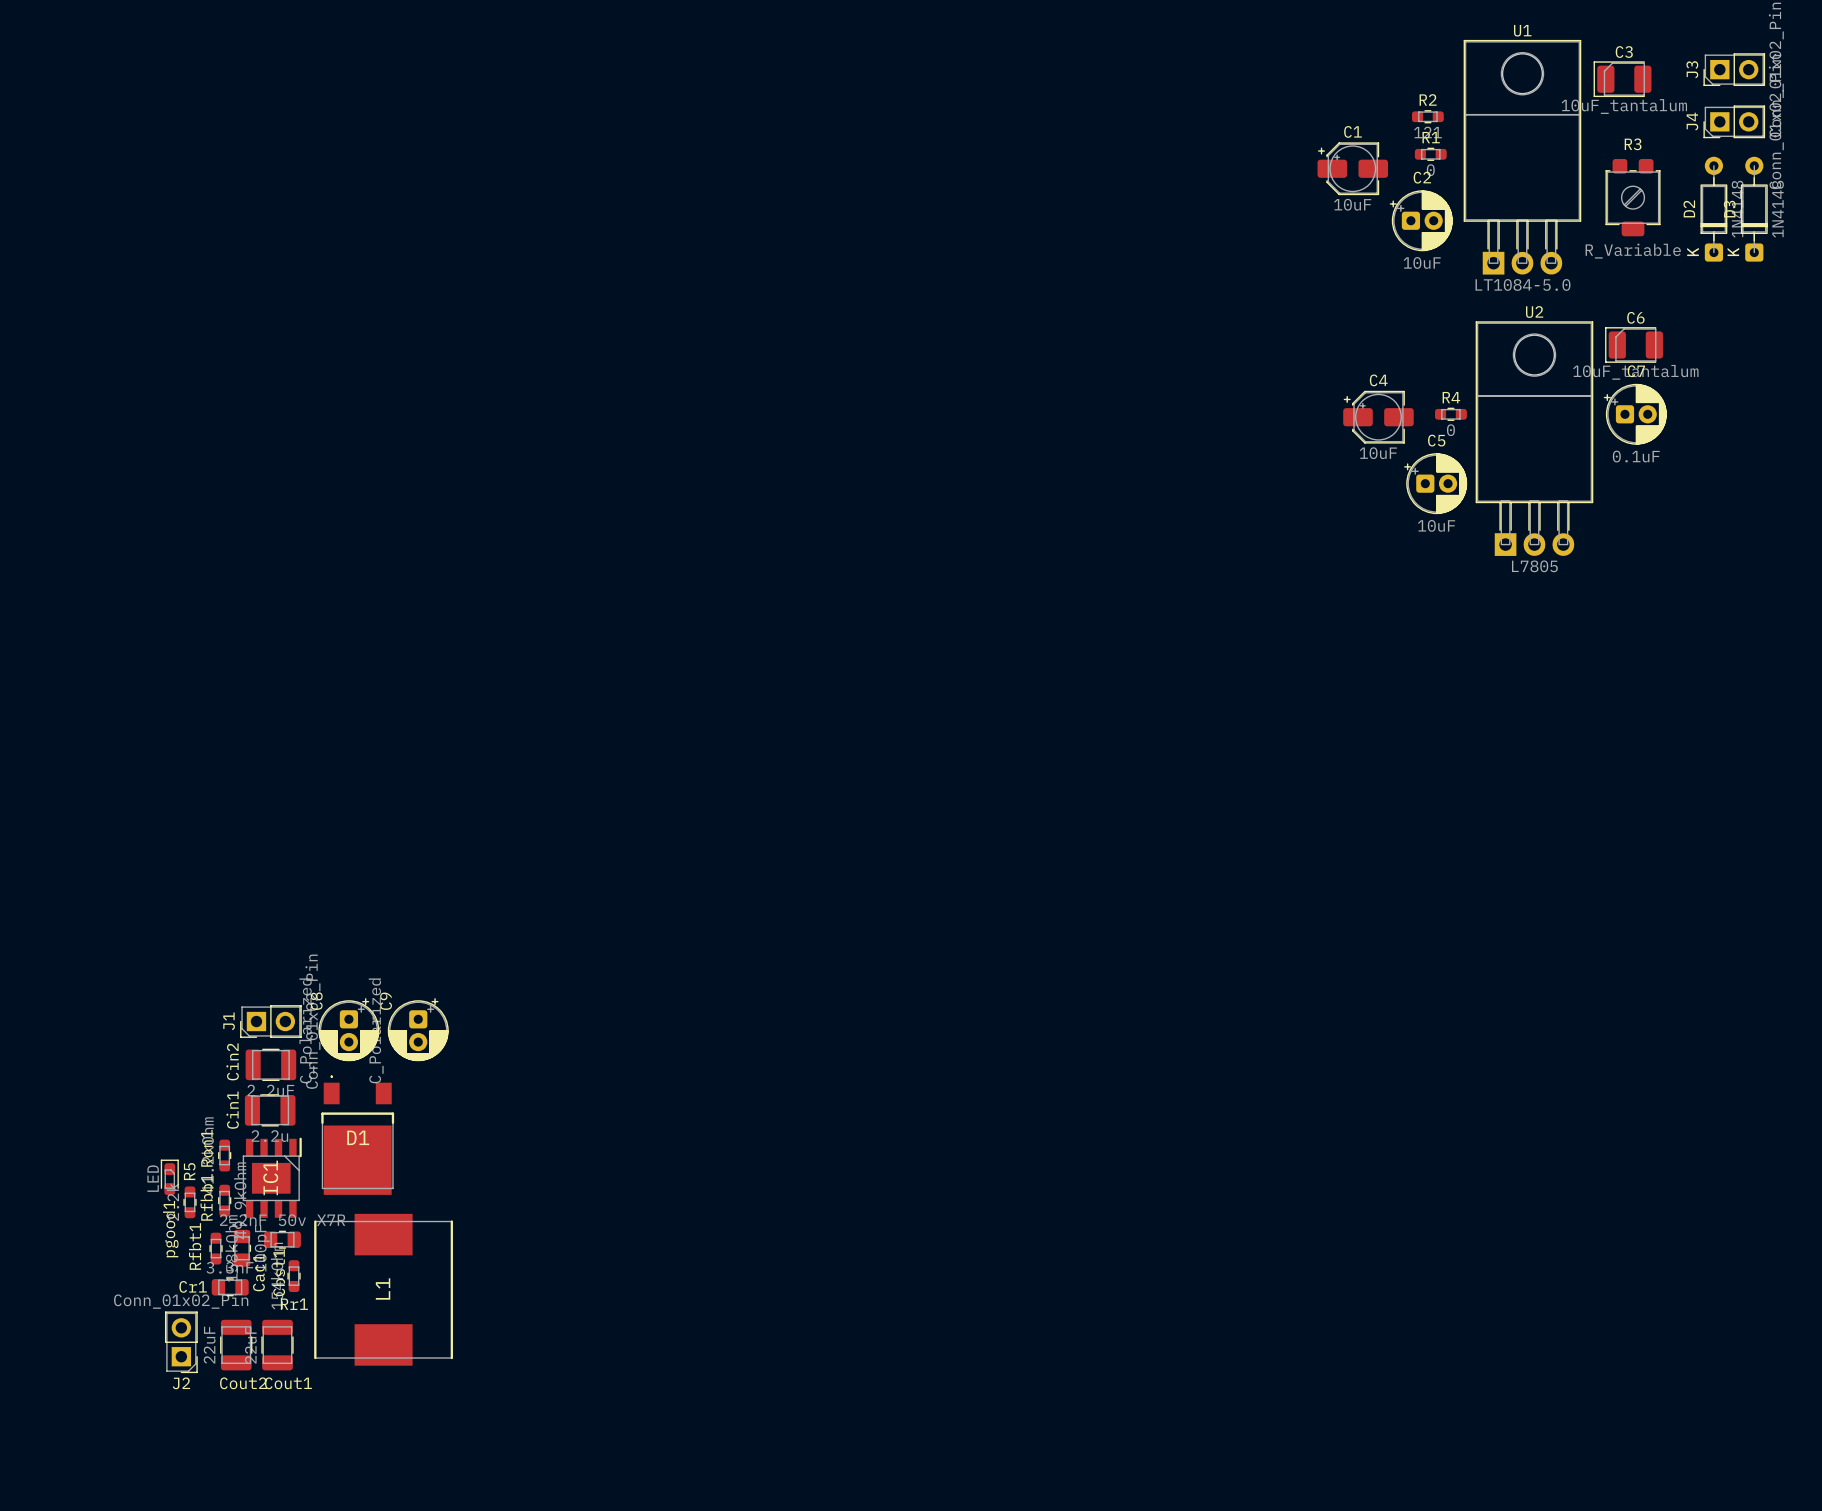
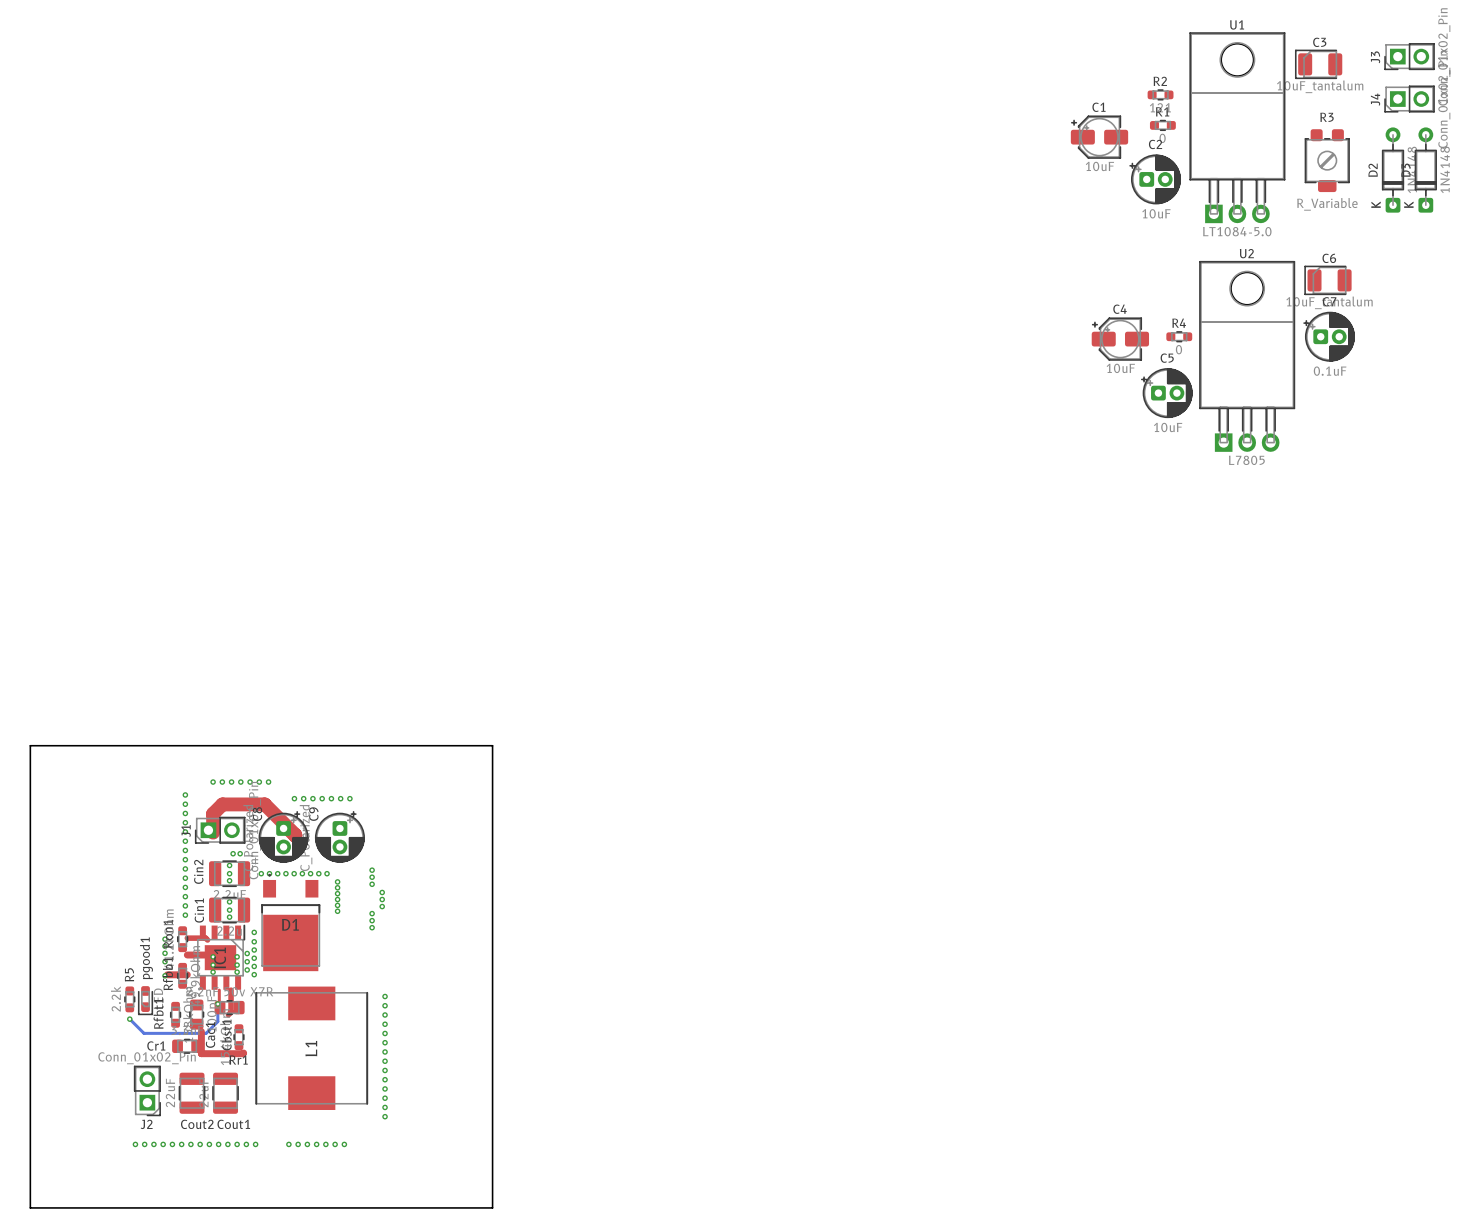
board edge: none -> (30, 745) (492, 745) (492, 1207) (30, 1207) (30, 745)
via: none -> (213, 782)
via: none -> (222, 782)
via: none -> (231, 782)
via: none -> (240, 782)
via: none -> (250, 782)
via: none -> (259, 782)
via: none -> (268, 782)
via: none -> (185, 794)
via: none -> (294, 798)
via: none -> (303, 798)
via: none -> (312, 798)
via: none -> (322, 798)
via: none -> (331, 798)
via: none -> (340, 798)
via: none -> (349, 798)
via: none -> (185, 804)
via: none -> (185, 813)
via: none -> (185, 822)
top track: none -> (288, 828) (295, 835) (264, 804) (222, 804) (213, 813) (213, 832)
via: none -> (185, 831)
via: none -> (185, 841)
via: none -> (185, 850)
via: none -> (233, 853)
via: none -> (240, 853)
via: none -> (185, 859)
Cin2 position: (270, 1064) -> (229, 873)
via: none -> (229, 865)
via: none -> (185, 868)
via: none -> (372, 870)
via: none -> (229, 873)
via: none -> (261, 873)
via: none -> (269, 873)
via: none -> (277, 873)
via: none -> (285, 873)
via: none -> (294, 873)
via: none -> (302, 873)
via: none -> (310, 873)
via: none -> (318, 873)
via: none -> (327, 873)
via: none -> (372, 877)
via: none -> (185, 878)
via: none -> (229, 880)
via: none -> (337, 881)
via: none -> (372, 884)
via: none -> (185, 887)
via: none -> (337, 887)
via: none -> (382, 892)
via: none -> (337, 893)
via: none -> (185, 896)
via: none -> (337, 899)
via: none -> (382, 899)
via: none -> (229, 901)
Cin1 position: (270, 1110) -> (229, 910)
via: none -> (337, 905)
via: none -> (185, 905)
via: none -> (382, 906)
via: none -> (229, 910)
via: none -> (337, 911)
via: none -> (372, 913)
via: none -> (185, 915)
via: none -> (229, 917)
via: none -> (372, 920)
via: none -> (372, 927)
via: none -> (254, 932)
top track: none -> (187, 938) (205, 938) (207, 940)
via: none -> (165, 939)
via: none -> (254, 941)
via: none -> (165, 946)
via: none -> (254, 950)
via: none -> (165, 953)
via: none -> (247, 953)
top track: none -> (187, 955) (211, 955) (213, 956)
pgood1 rotation: 0° (169, 1177) -> 180° (145, 1000)
pgood1 position: (169, 1177) -> (145, 1000)
via: none -> (213, 956)
via: none -> (237, 956)
via: none -> (254, 958)
via: none -> (165, 961)
via: none -> (247, 961)
via: none -> (213, 965)
via: none -> (237, 965)
via: none -> (254, 966)
via: none -> (247, 969)
via: none -> (213, 972)
via: none -> (237, 972)
top track: none -> (167, 974) (187, 974)
via: none -> (254, 974)
via: none -> (165, 975)
R5 position: (190, 1202) -> (129, 999)
top track: none -> (219, 990) (217, 1004)
top track: none -> (231, 990) (231, 1012) (228, 1014)
via: none -> (385, 996)
bottom track: none -> (217, 1004) (217, 1021) (206, 1033) (144, 1033) (129, 1019)
via: none -> (217, 1004)
via: none -> (385, 1005)
via: none -> (385, 1015)
via: none -> (129, 1019)
via: none -> (385, 1024)
top track: none -> (201, 1031) (201, 1053) (243, 1053)
via: none -> (385, 1033)
via: none -> (385, 1042)
via: none -> (385, 1051)
via: none -> (385, 1061)
via: none -> (385, 1070)
via: none -> (385, 1079)
via: none -> (385, 1088)
via: none -> (385, 1098)
via: none -> (385, 1107)
via: none -> (385, 1116)
via: none -> (135, 1144)
via: none -> (144, 1144)
via: none -> (153, 1144)
via: none -> (163, 1144)
via: none -> (172, 1144)
via: none -> (181, 1144)
via: none -> (190, 1144)
via: none -> (200, 1144)
via: none -> (209, 1144)
via: none -> (218, 1144)
via: none -> (227, 1144)
via: none -> (237, 1144)
via: none -> (246, 1144)
via: none -> (255, 1144)
via: none -> (288, 1144)
via: none -> (298, 1144)
via: none -> (307, 1144)
via: none -> (316, 1144)
via: none -> (325, 1144)
via: none -> (335, 1144)
via: none -> (344, 1144)

